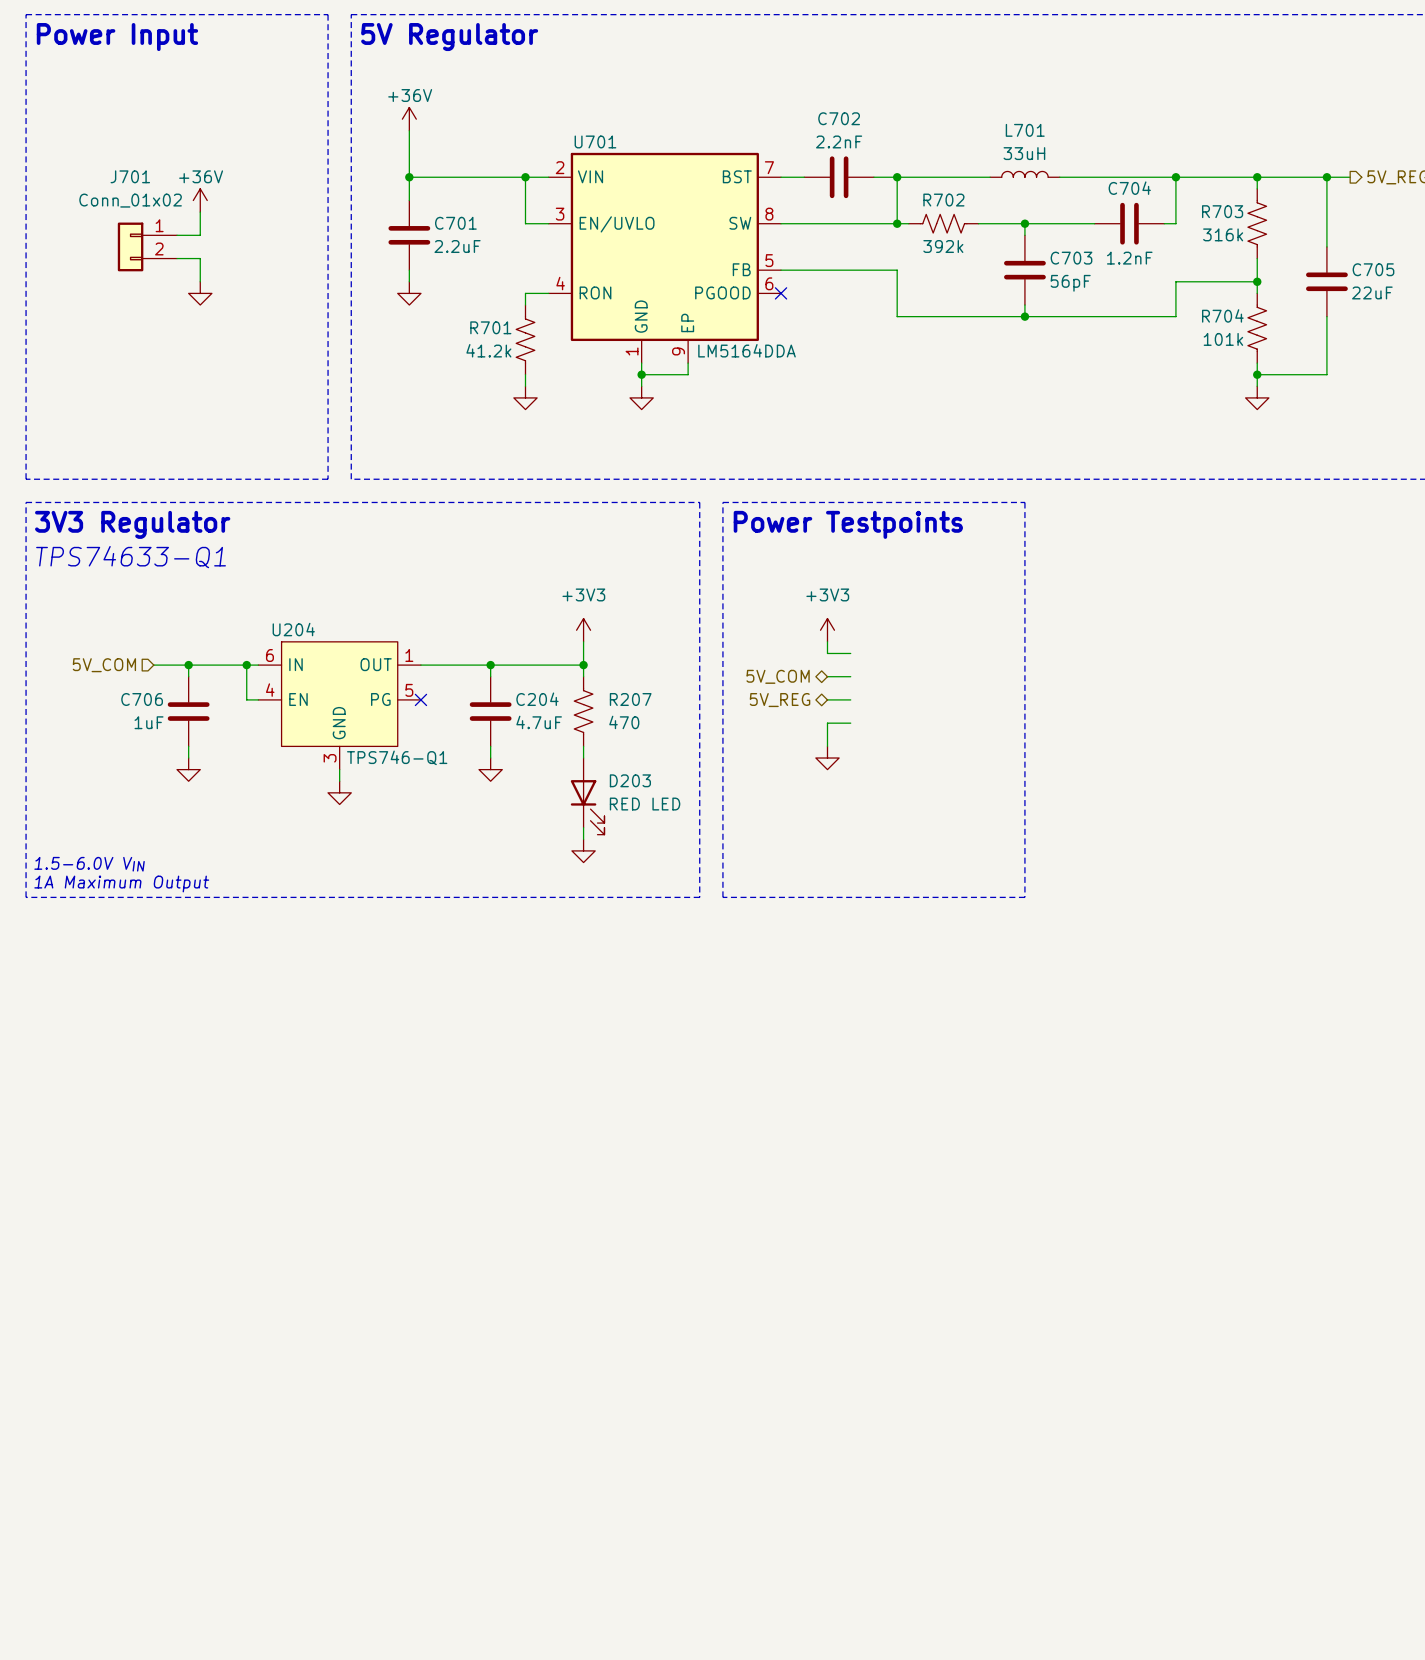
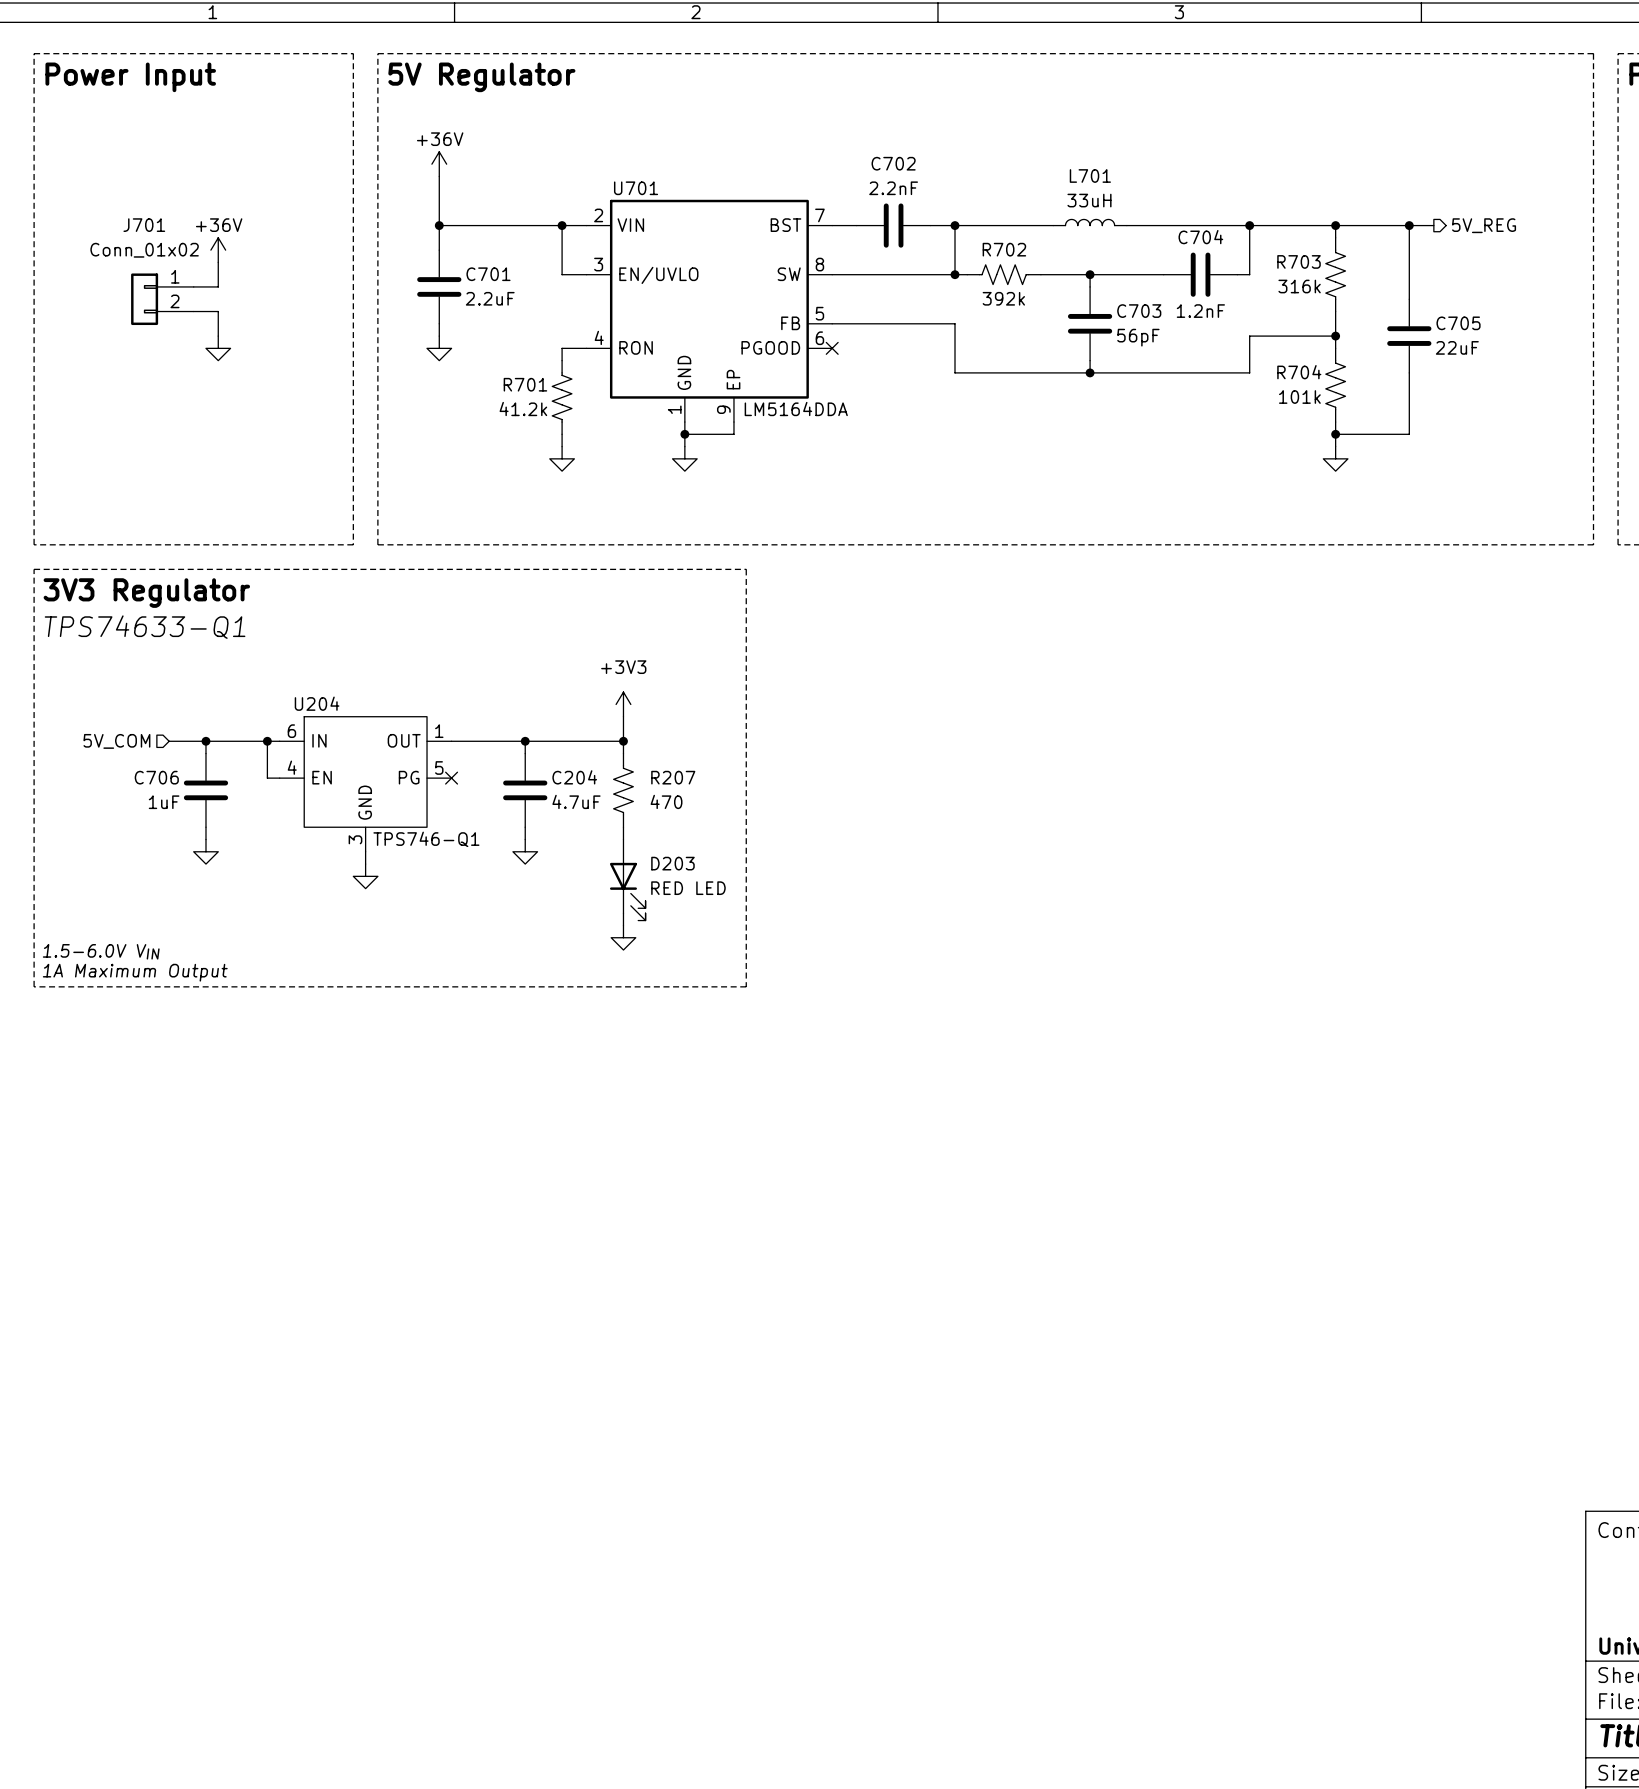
line: (722, 502) (1024, 502) (1024, 897) (722, 897) (722, 502) -> none
text: Power Testpoints (848, 524) -> none
power symbol: +3V3 (827, 630) -> none
wire: (827, 641) (827, 653) (850, 653) -> none
hierarchical label: 5V_COM (778, 676) -> none
wire: (827, 676) (850, 676) -> none
wire: (827, 699) (850, 699) -> none
hierarchical label: 5V_REG (780, 700) -> none
wire: (850, 723) (827, 723) (827, 746) -> none
power symbol: (827, 758) -> none

